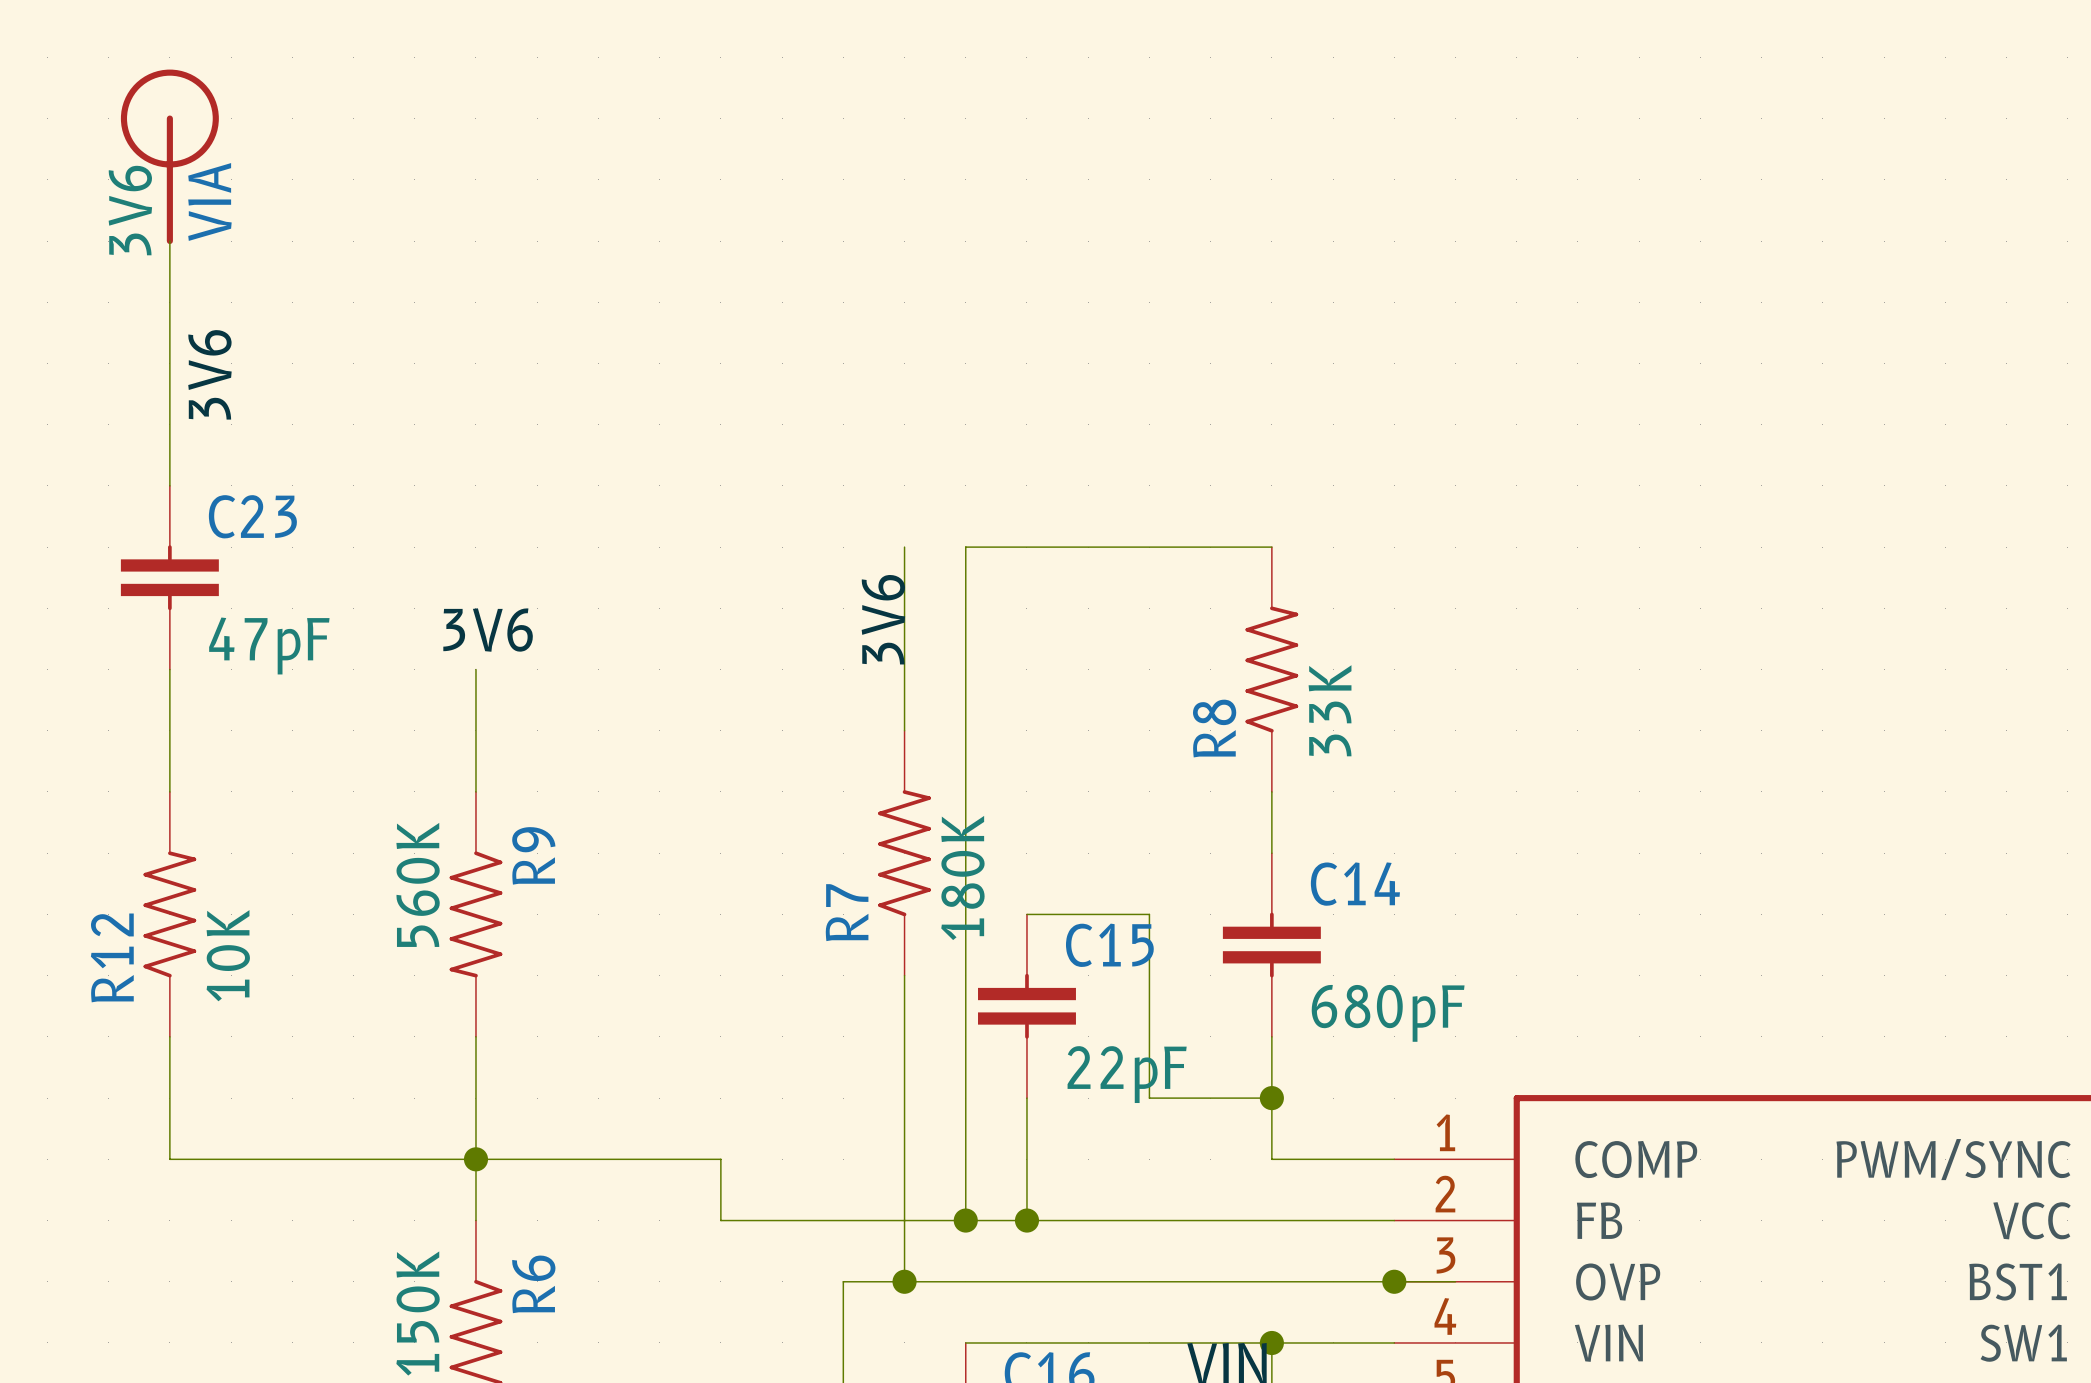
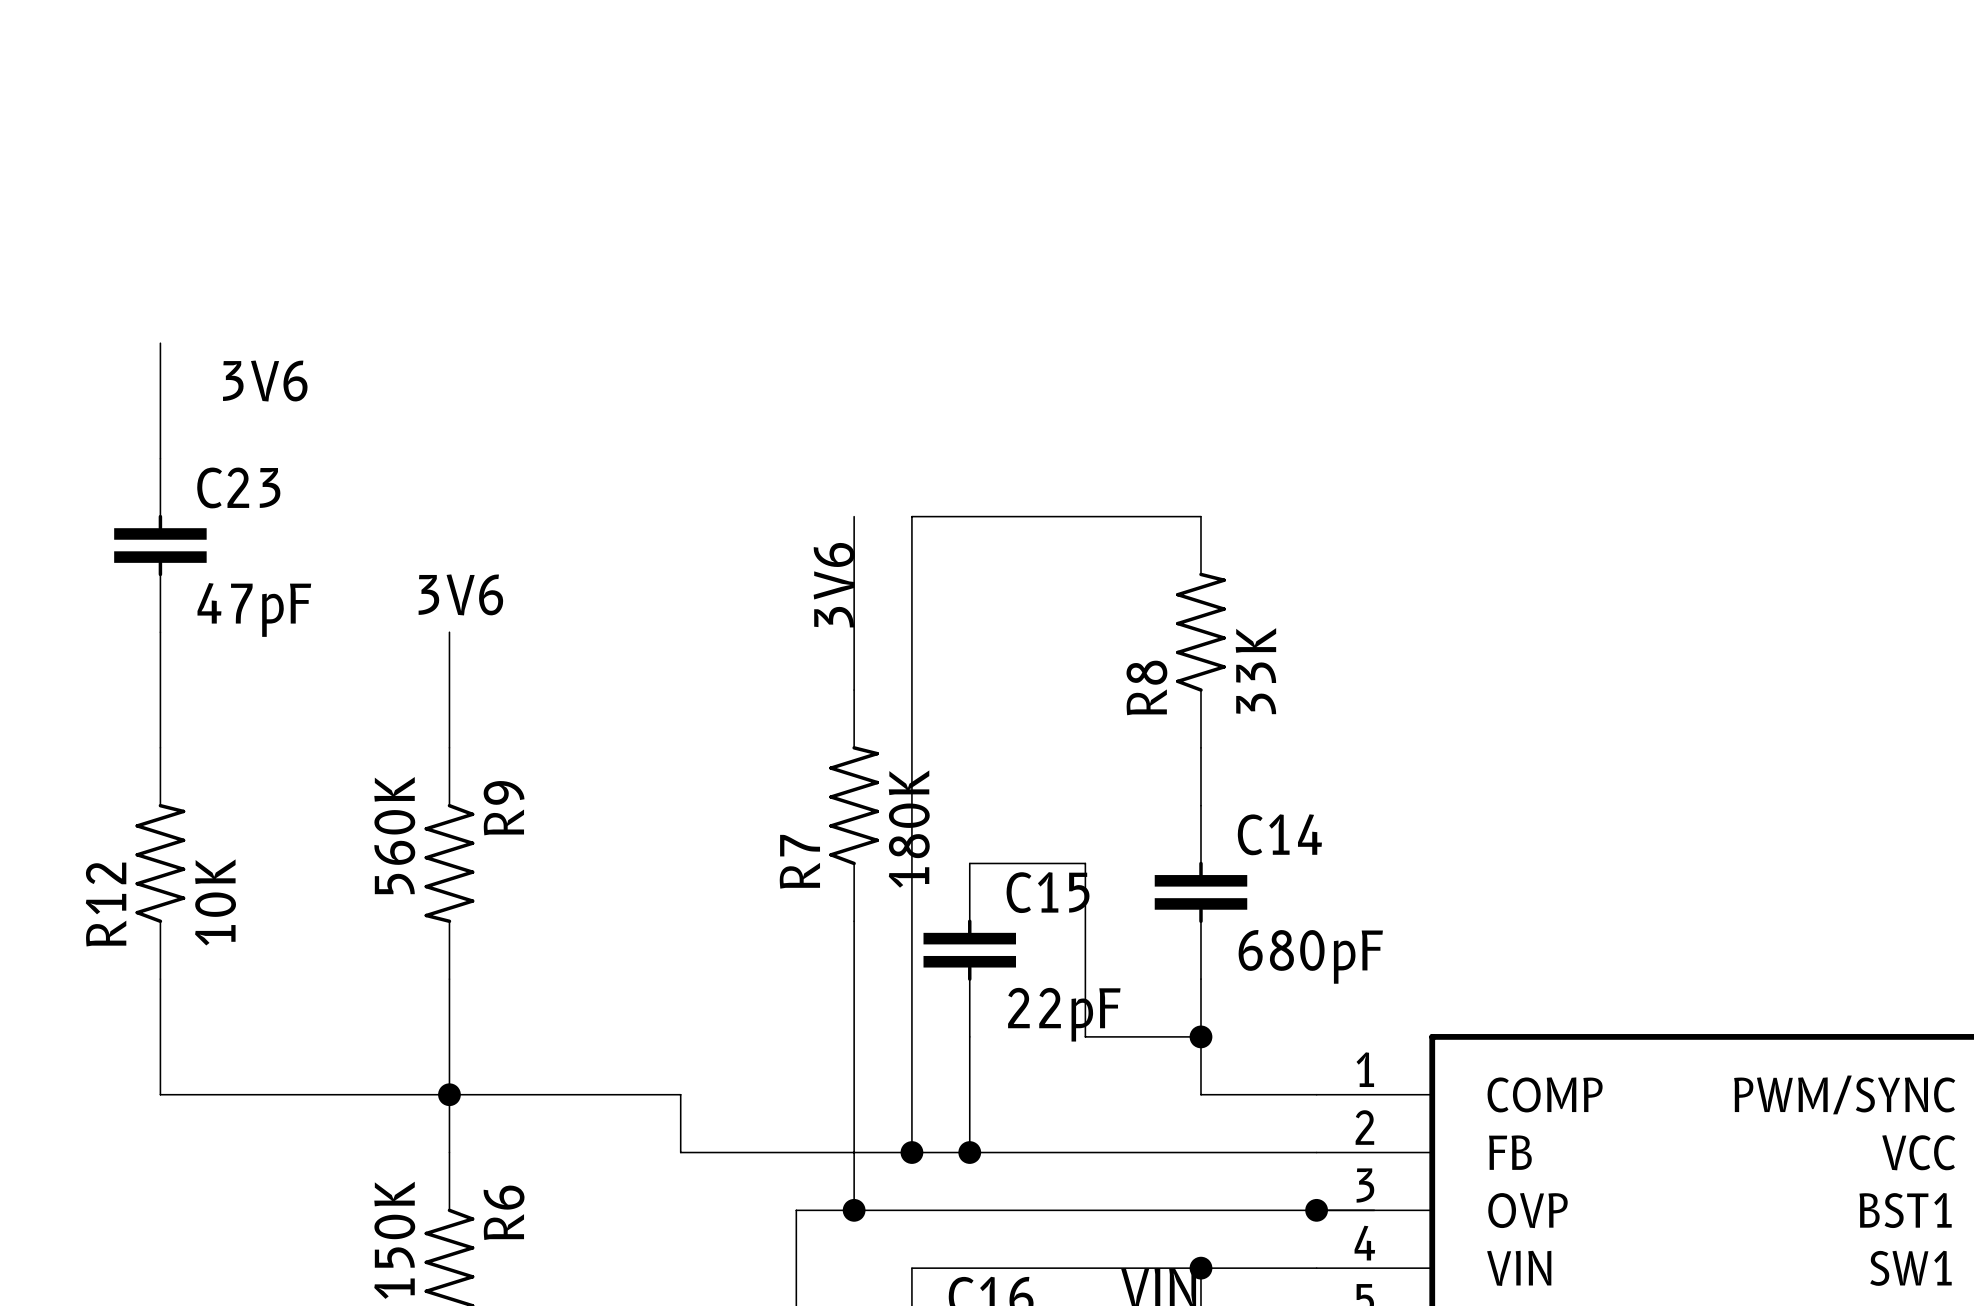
part: 3V6 (169, 156) -> none
wire: (169, 241) (169, 363) -> none
label rotation: 0° (209, 374) -> 90° clockwise (265, 381)

